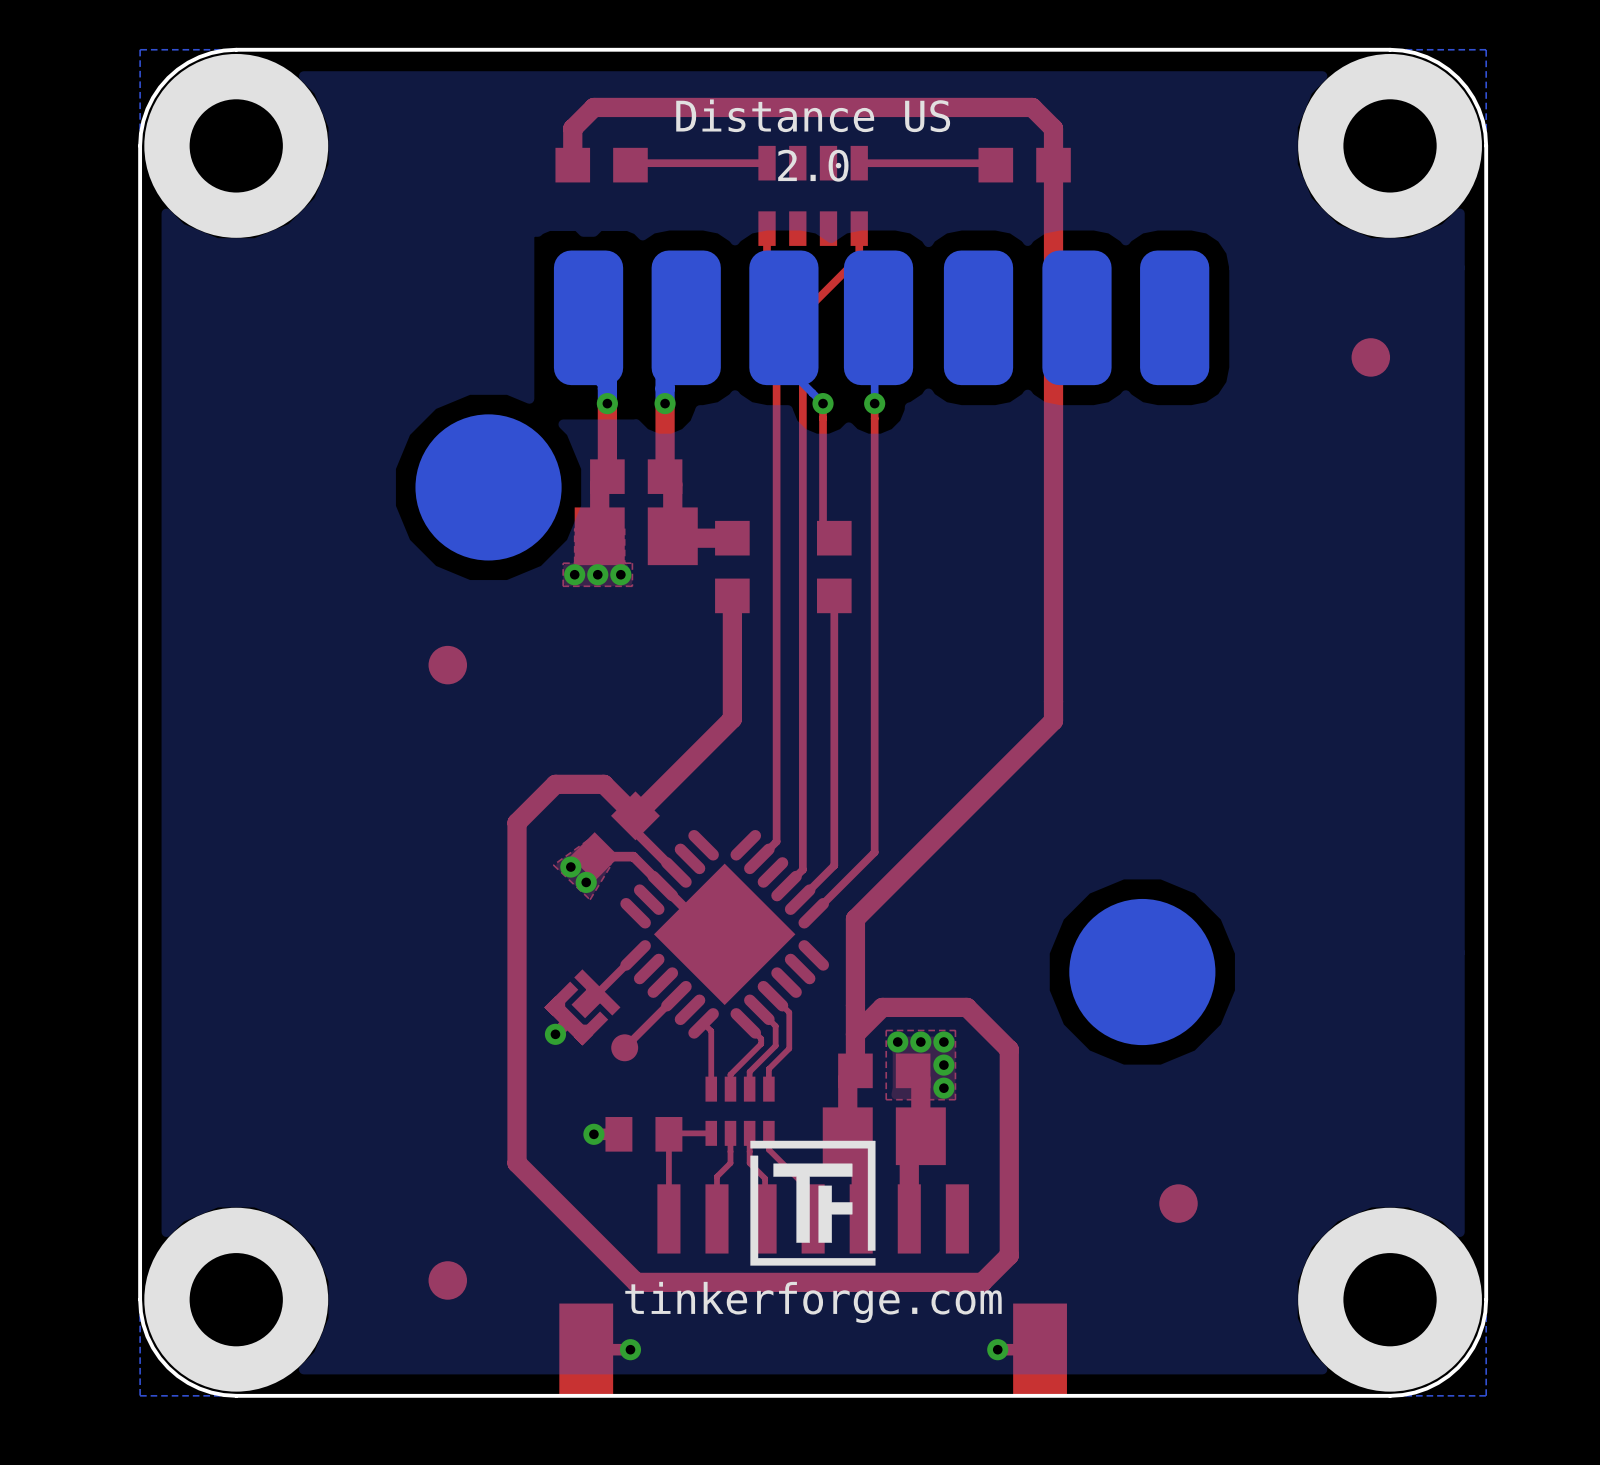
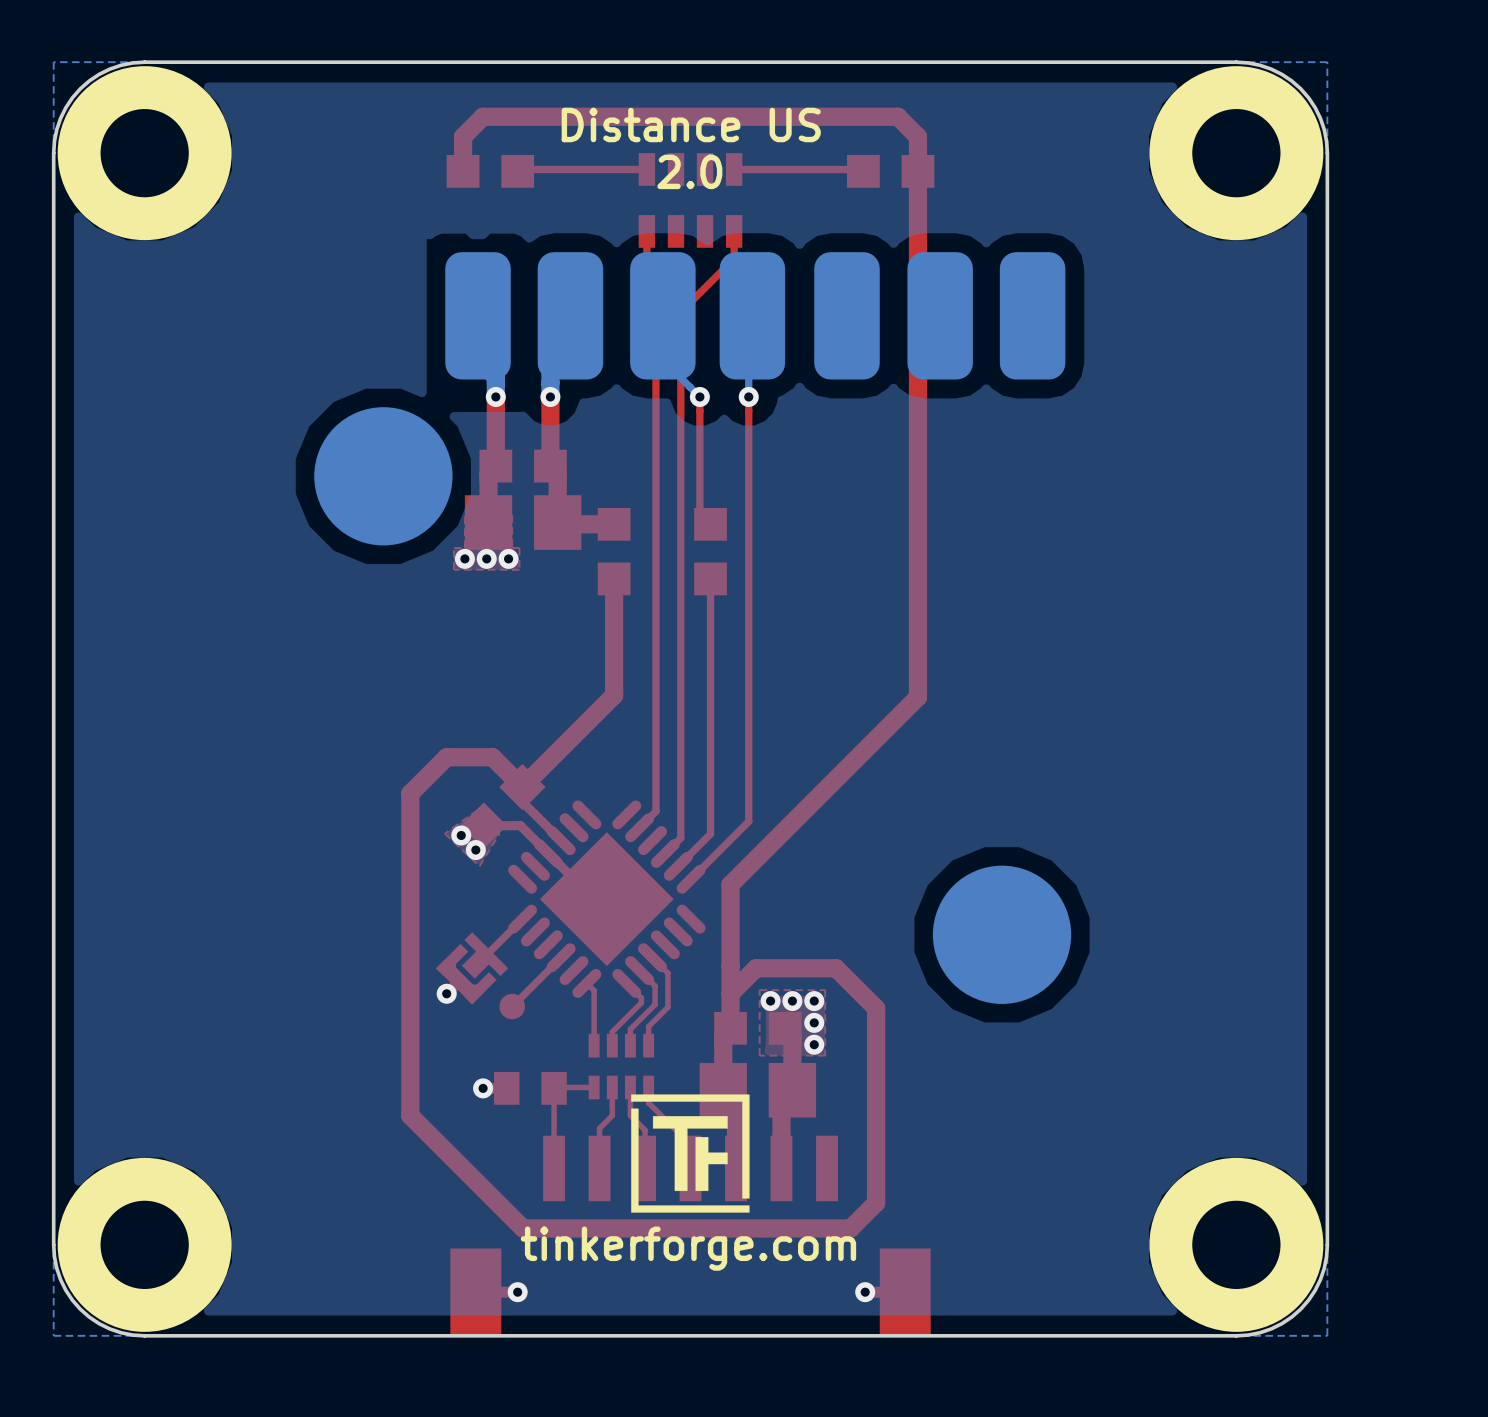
part: (1370, 357) -> none
part: (447, 665) -> none
part: (1178, 1203) -> none
part: (447, 1280) -> none

